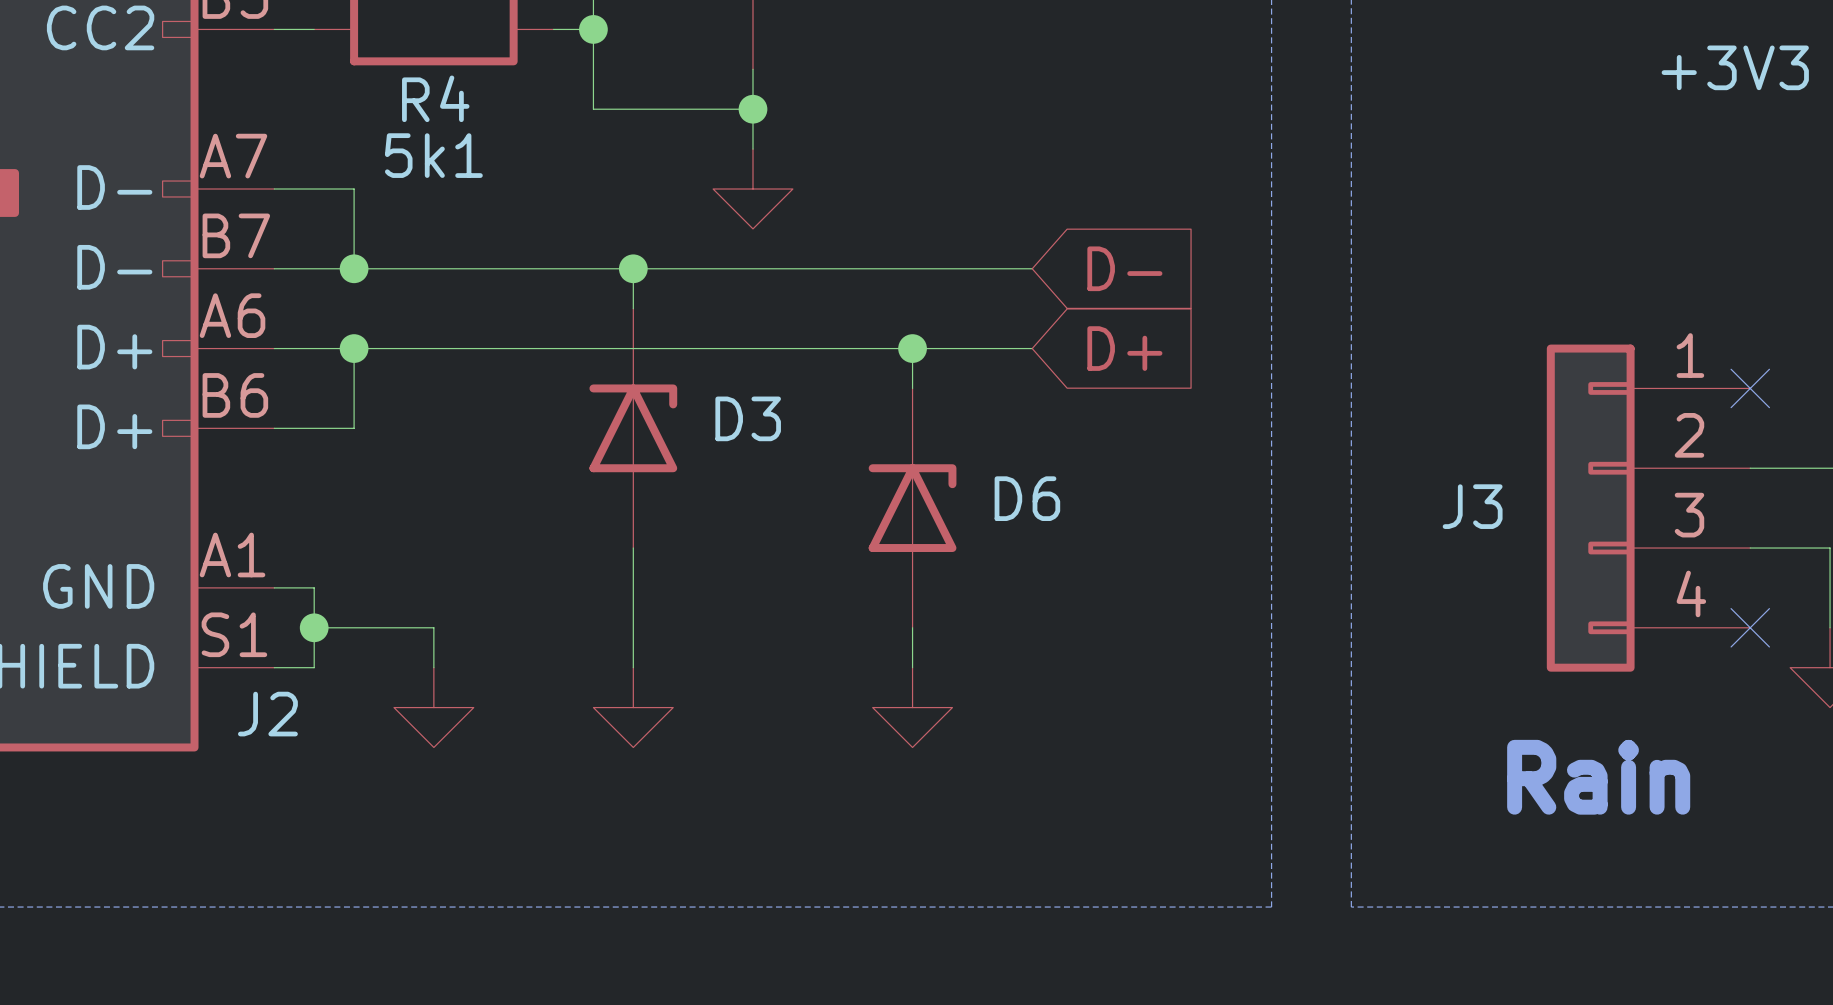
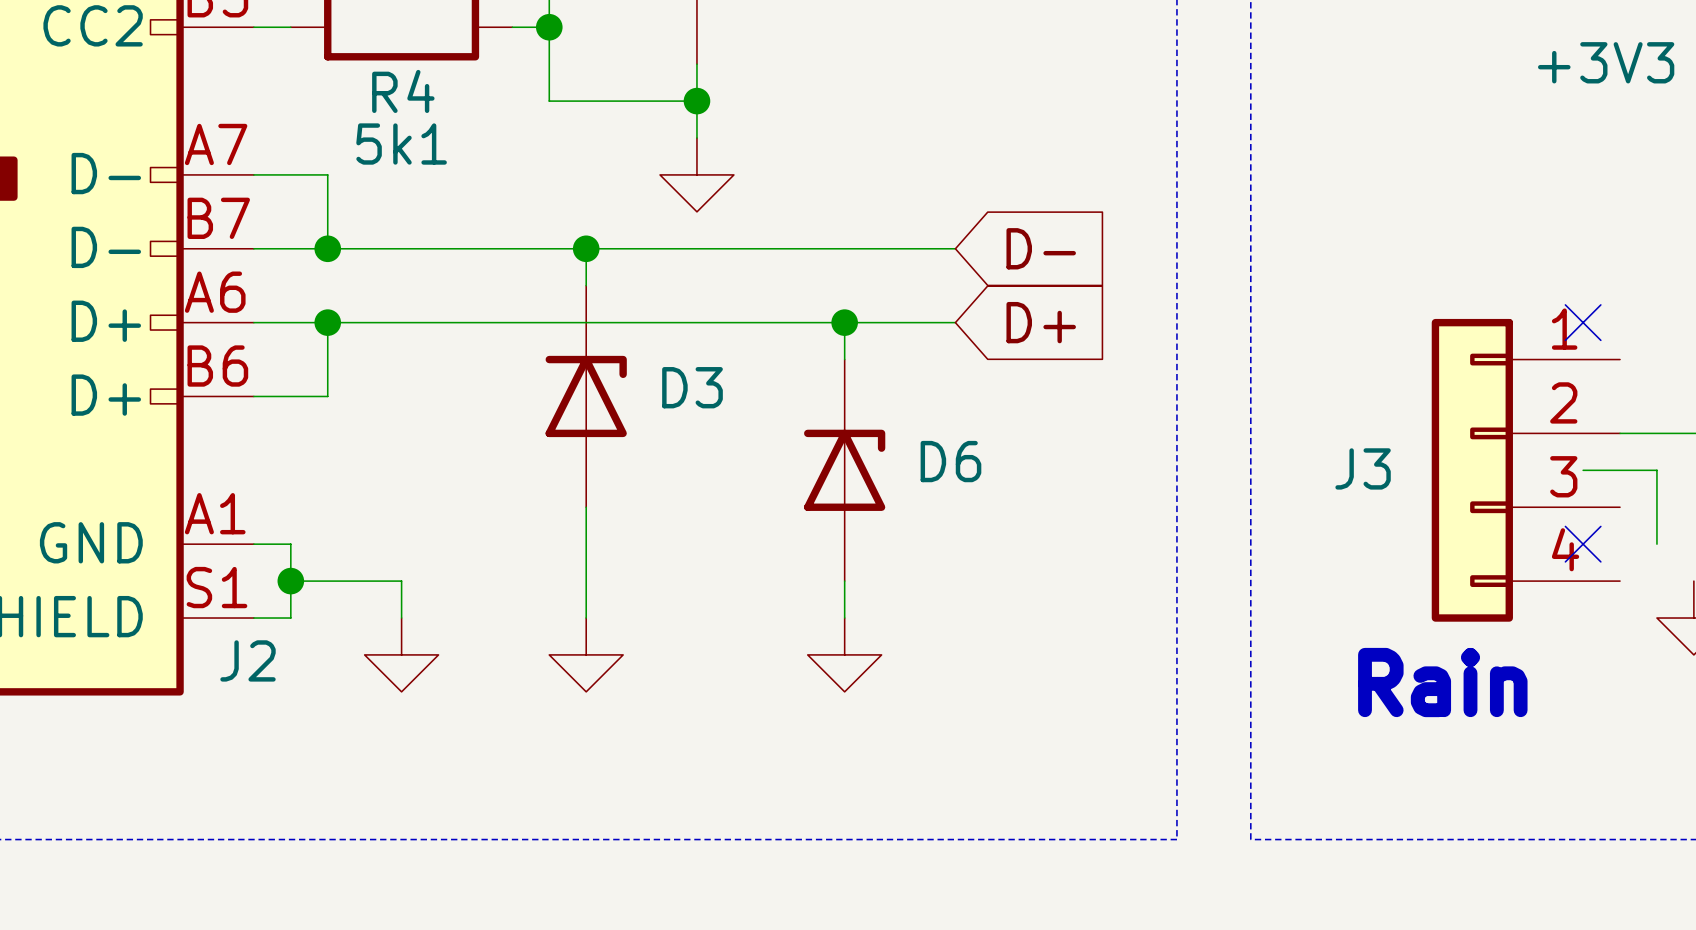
no-connect mark position: (1750, 388) -> (1583, 322)
wire: (1750, 548) (1830, 548) (1830, 627) -> (1583, 470) (1656, 470) (1656, 544)
no-connect mark position: (1750, 627) -> (1583, 544)
text position: Rain (1598, 777) -> Rain (1442, 682)

